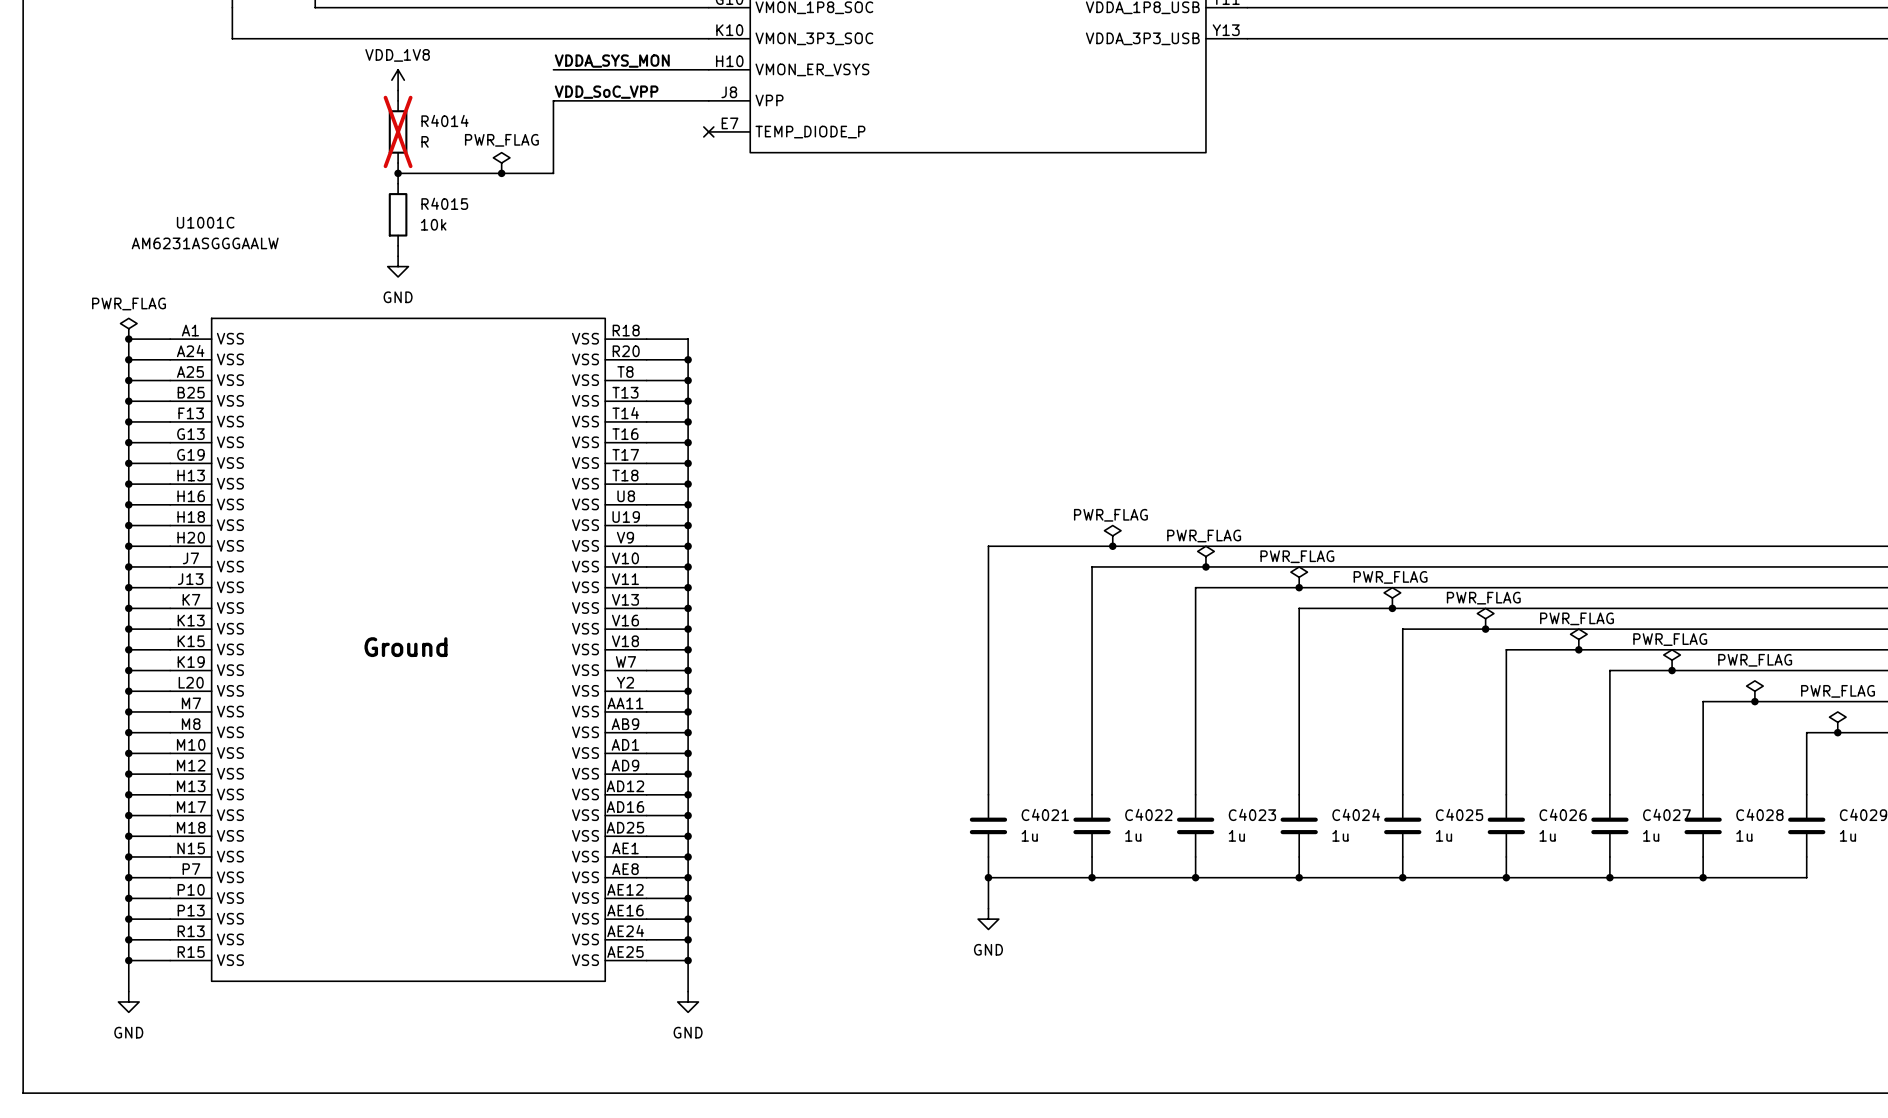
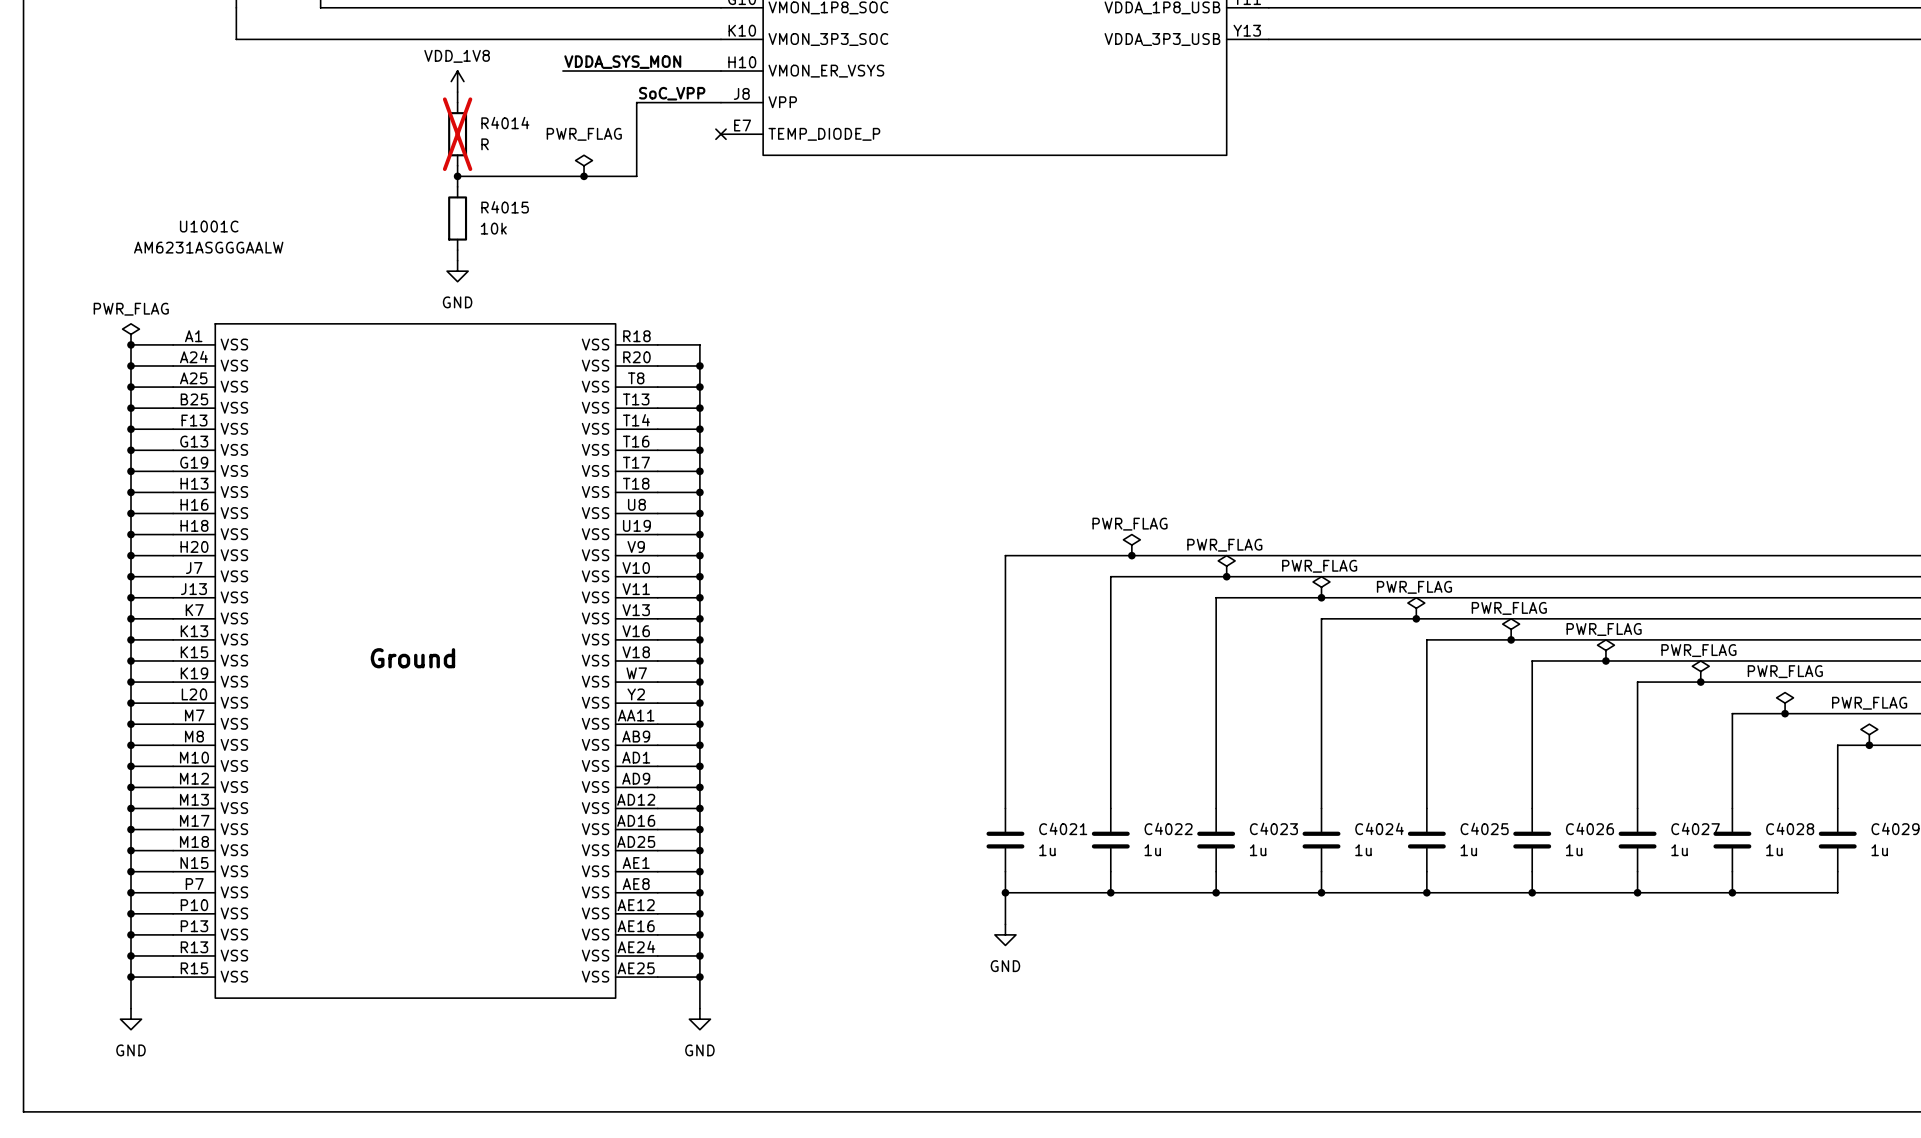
power symbol position: VDD_1V8 (398, 80) -> VDD_1V8 (457, 81)
wire: (398, 90) (398, 100) -> (457, 92) (457, 102)
label: VDD_SoC_VPP (606, 92) -> SoC_VPP (672, 93)
wire: (625, 100) (553, 100) (553, 173) -> (636, 102) (636, 176) (562, 176)
R4014 position: (398, 131) -> (457, 134)
power symbol text position: PWR_FLAG (501, 140) -> PWR_FLAG (584, 134)
wire: (398, 163) (398, 183) -> (457, 165) (457, 186)
power symbol position: PWR_FLAG (501, 163) -> PWR_FLAG (584, 165)
wire: (398, 173) (449, 173) -> none
junction: (398, 173) -> none
junction: none -> (457, 176)
junction: (501, 173) -> none
junction: none -> (584, 176)
R4015 position: (398, 214) -> (457, 218)
wire: (398, 245) (398, 256) -> (457, 250) (457, 260)
power symbol position: GND (398, 266) -> GND (457, 271)

